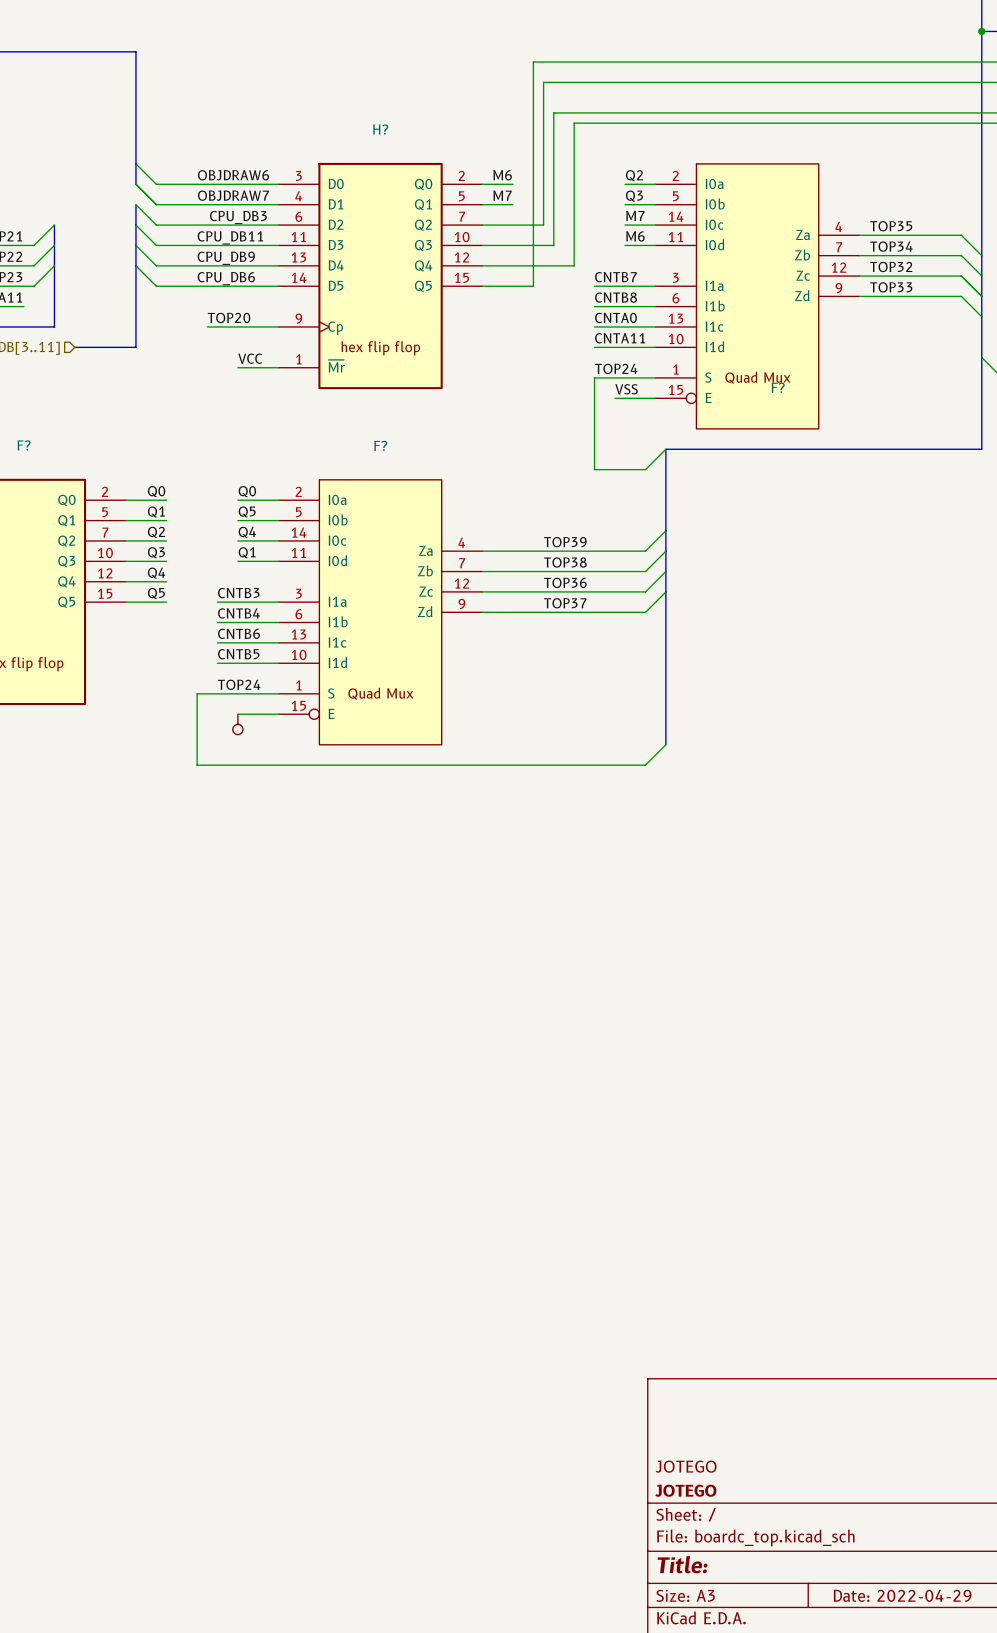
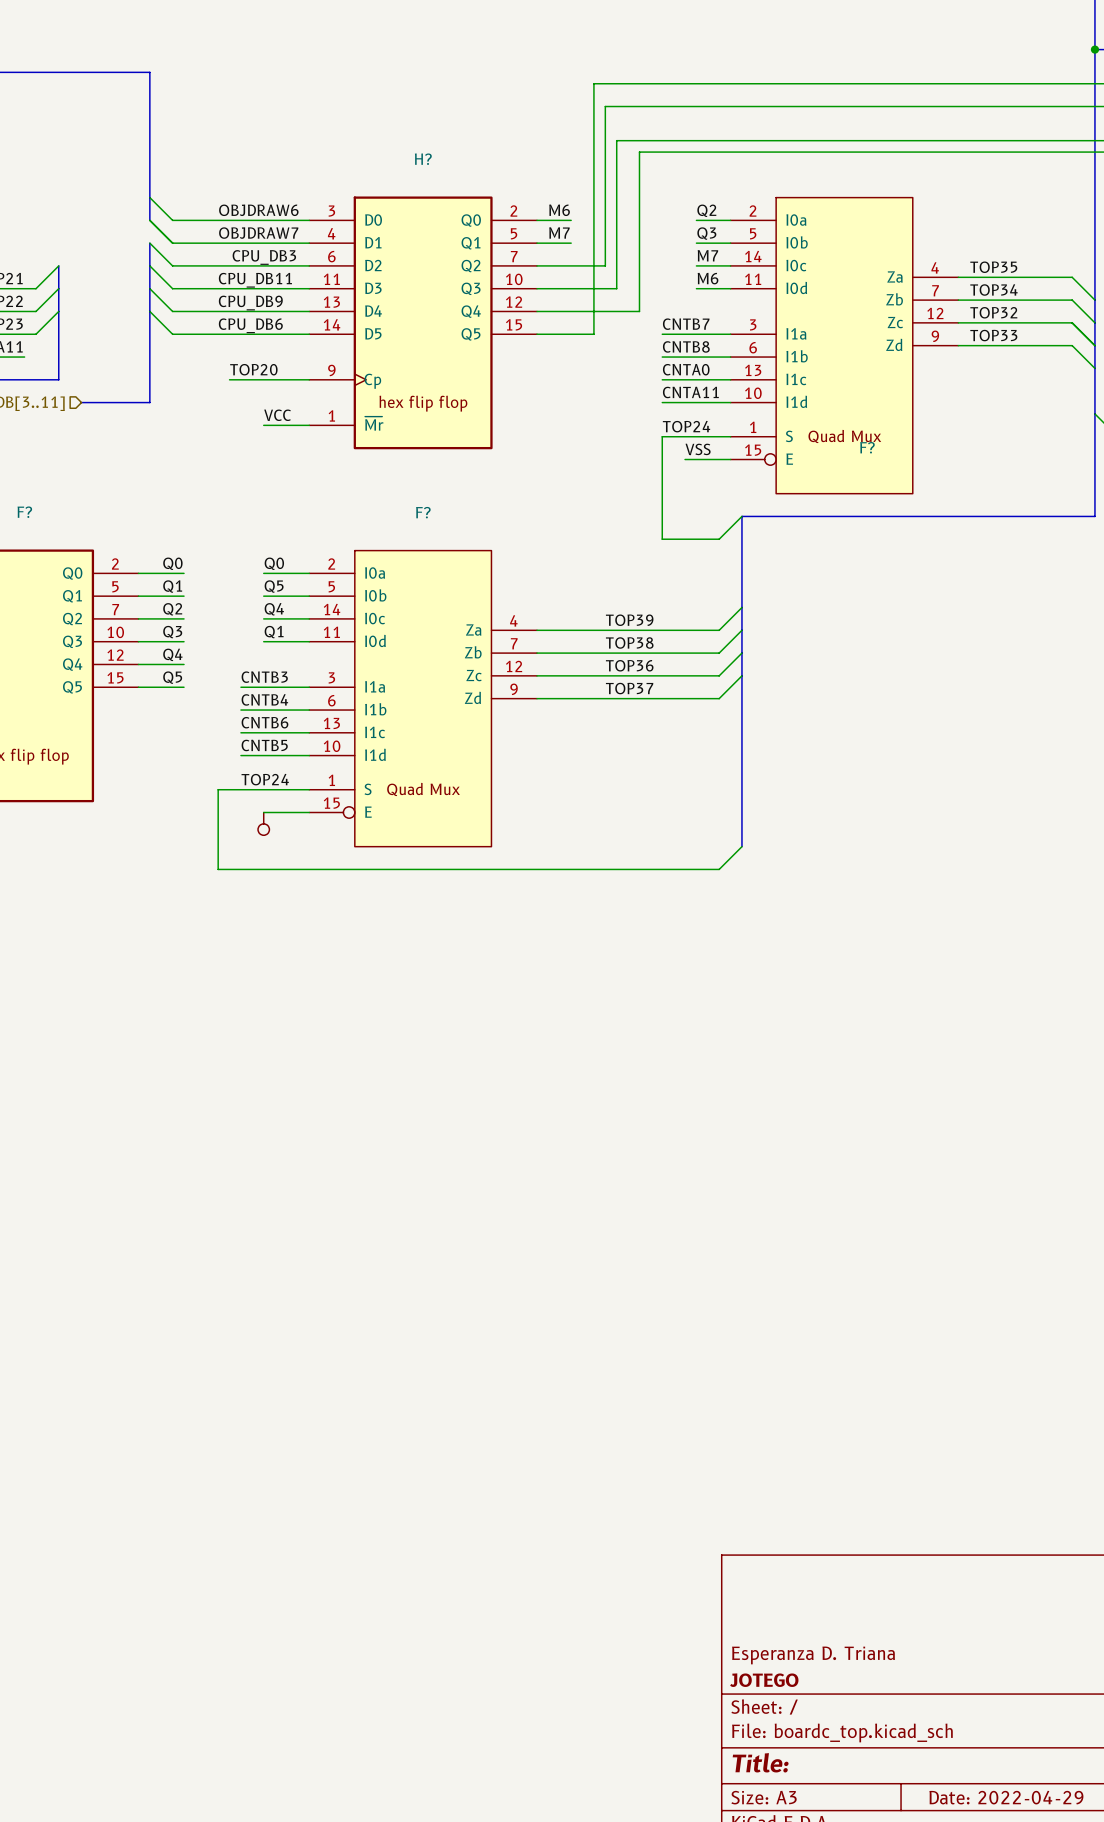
title block: JOTEGO (686, 1466) -> Esperanza D. Triana (813, 1655)

